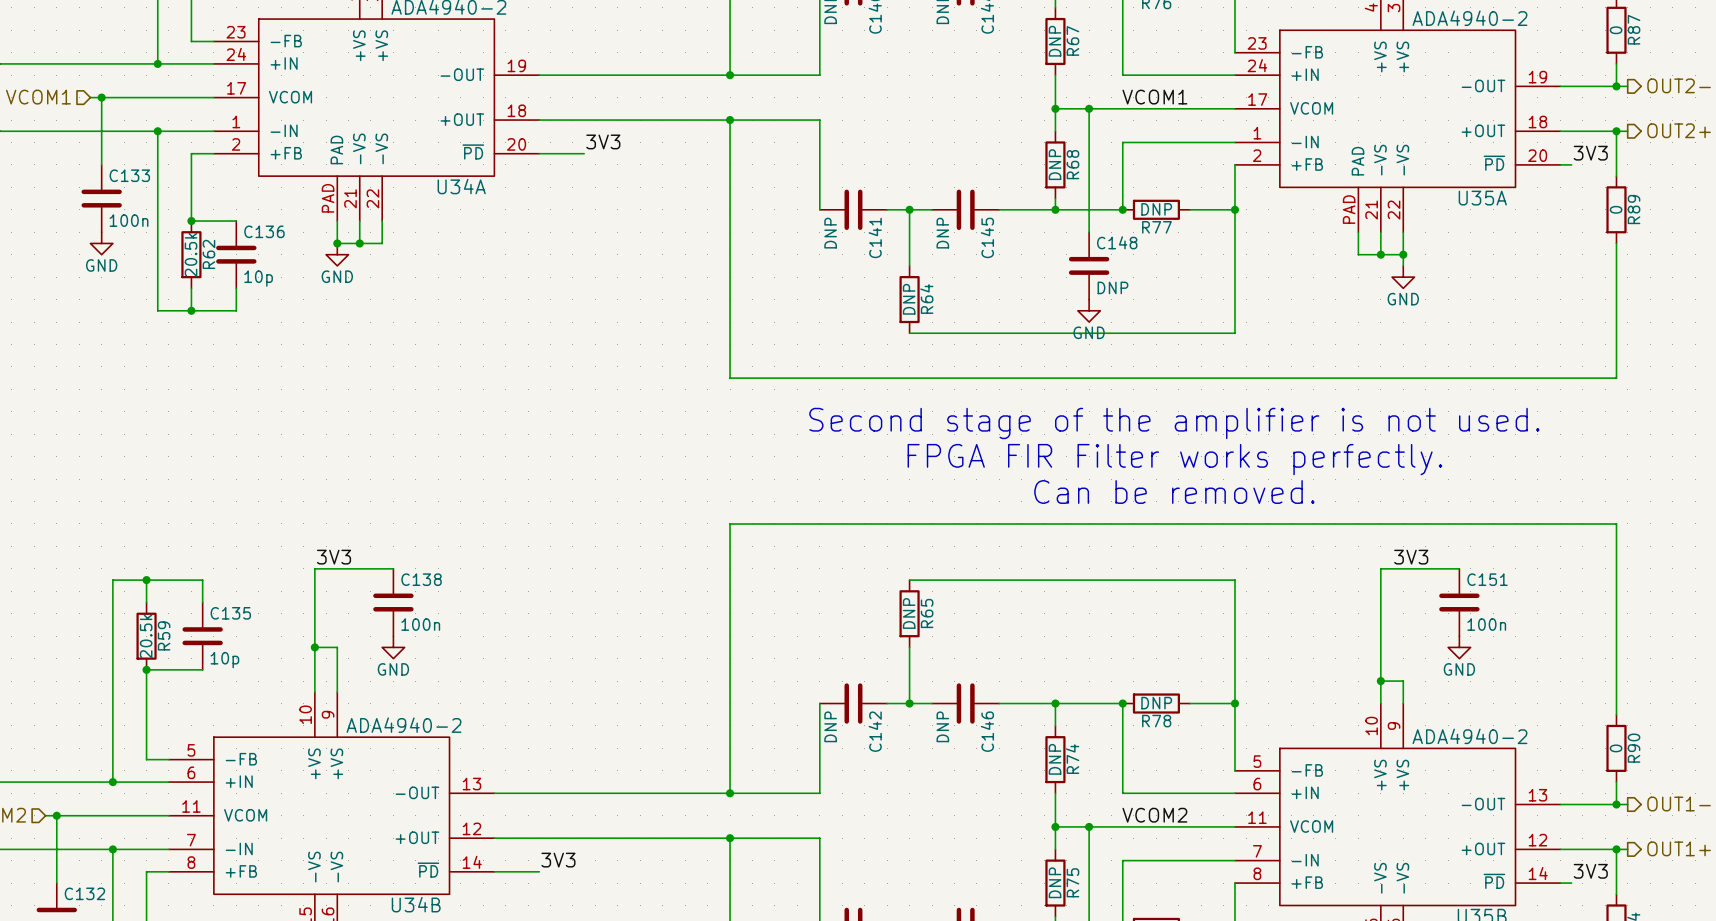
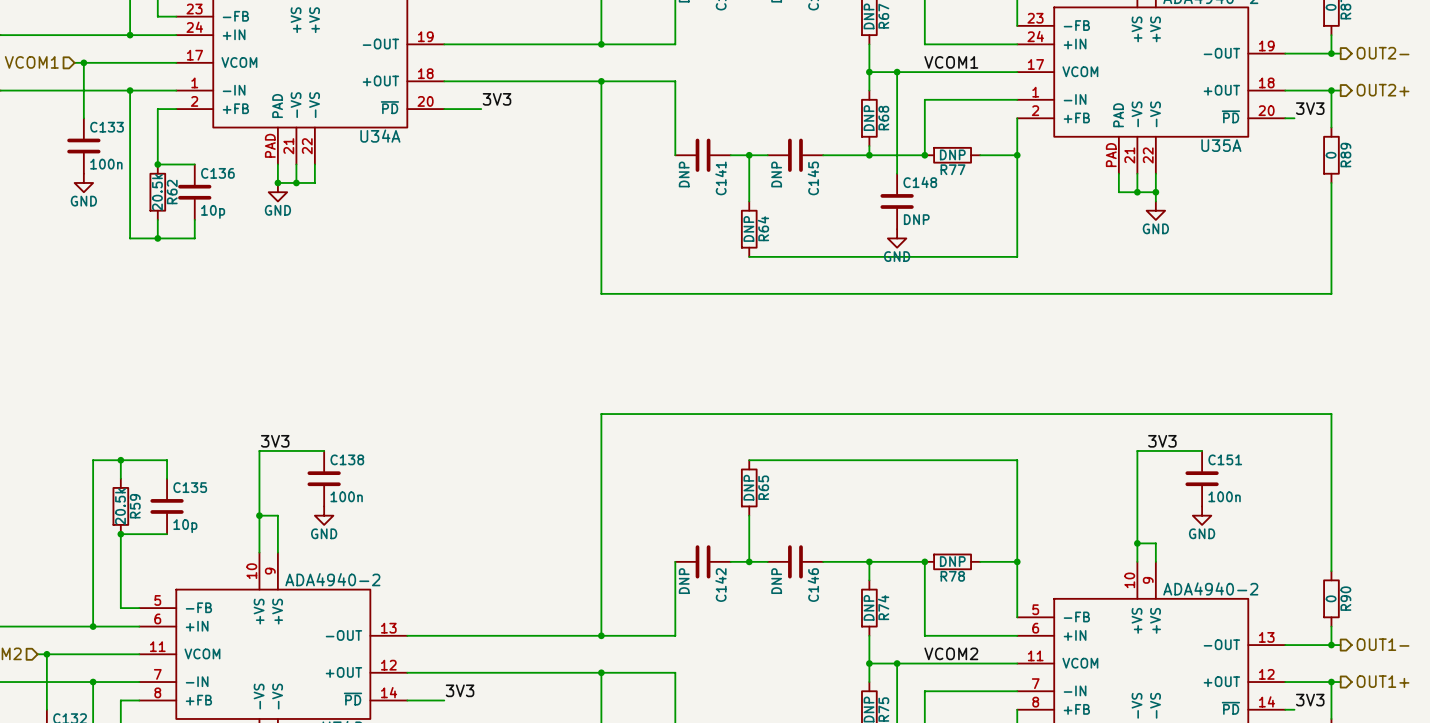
text: Second stage of the amplifier is not used. (1174, 423) -> none
text: FPGA FIR Filter works perfectly. (1174, 459) -> none
text: Can be removed. (1174, 491) -> none

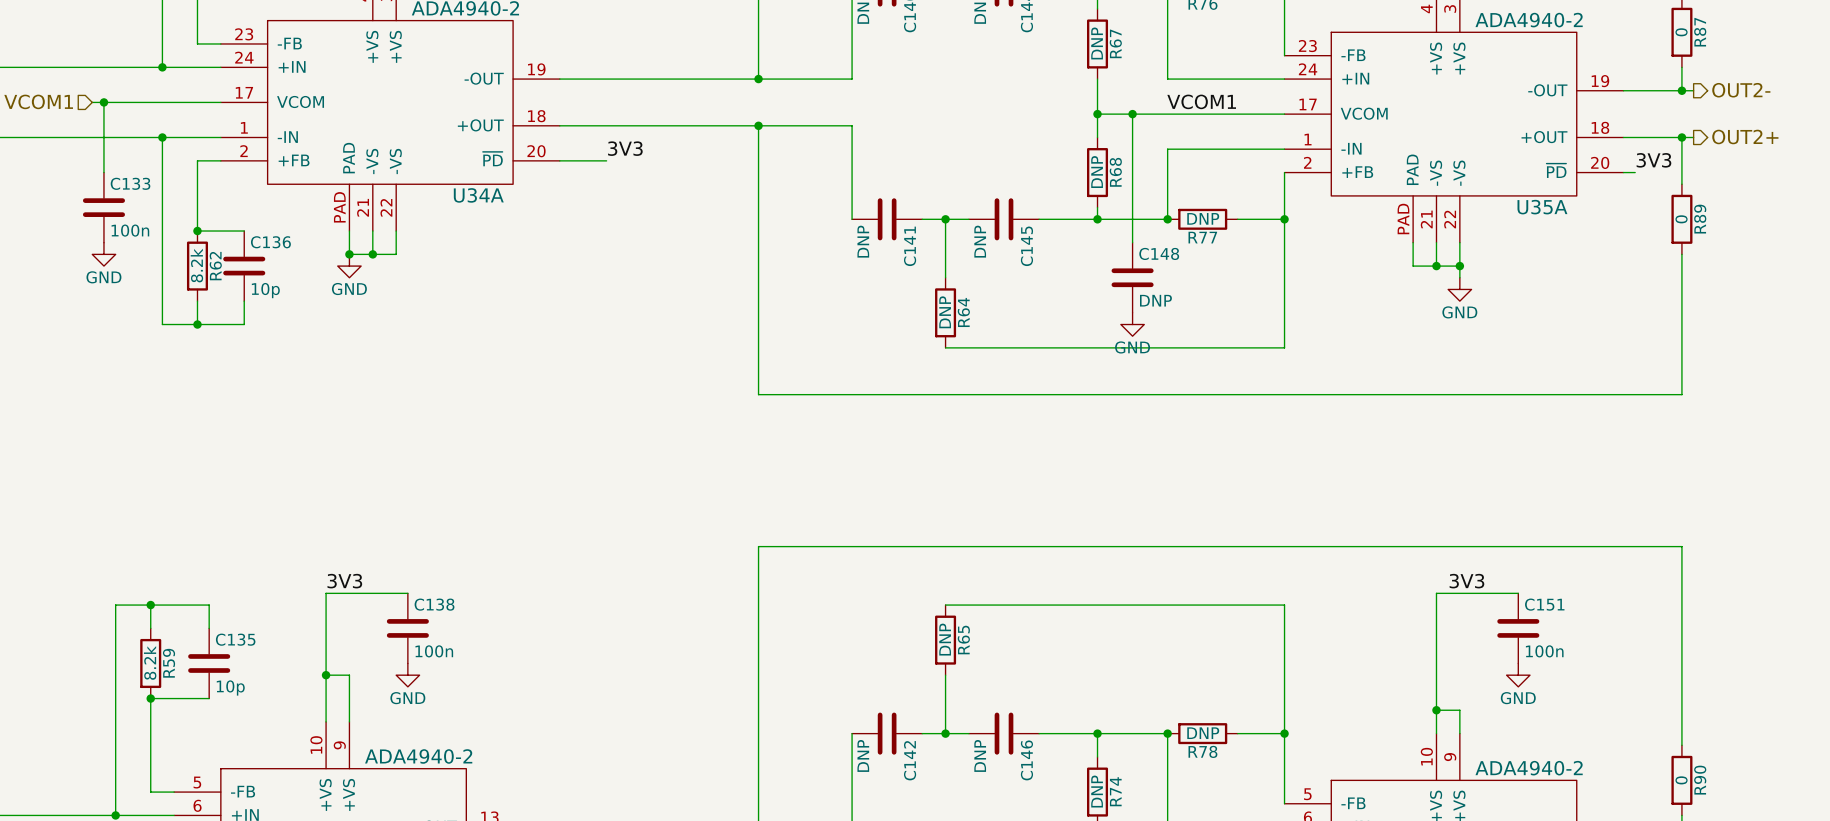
R62 value: 20.5k (157, 192) -> 8.2k (196, 265)
R59 value: 20.5k (120, 506) -> 8.2k (150, 662)

